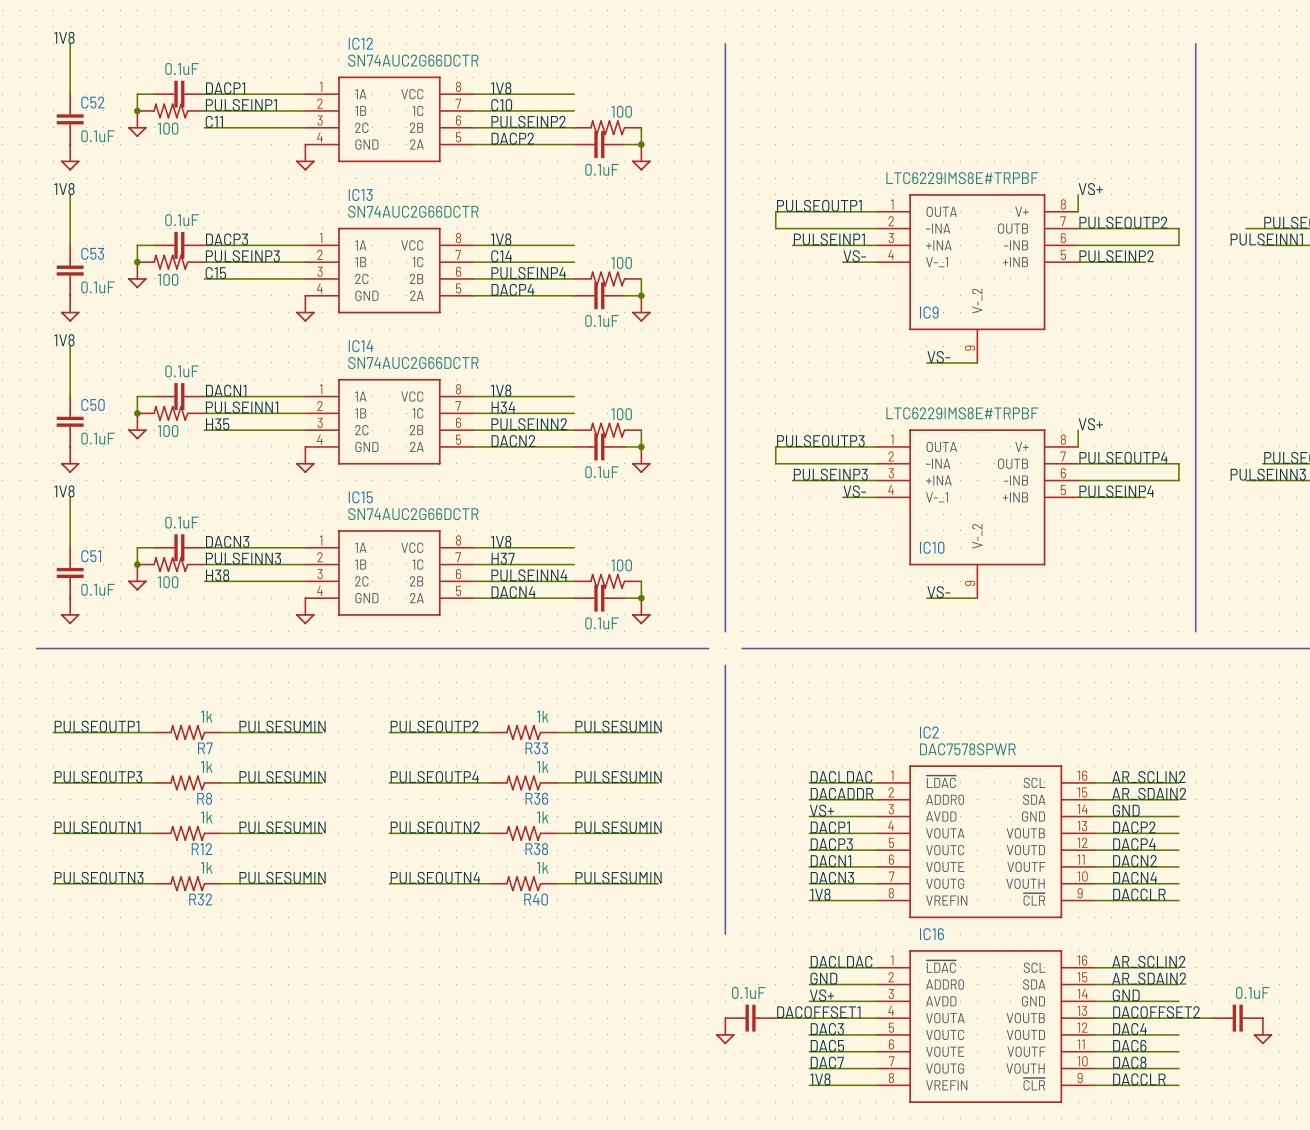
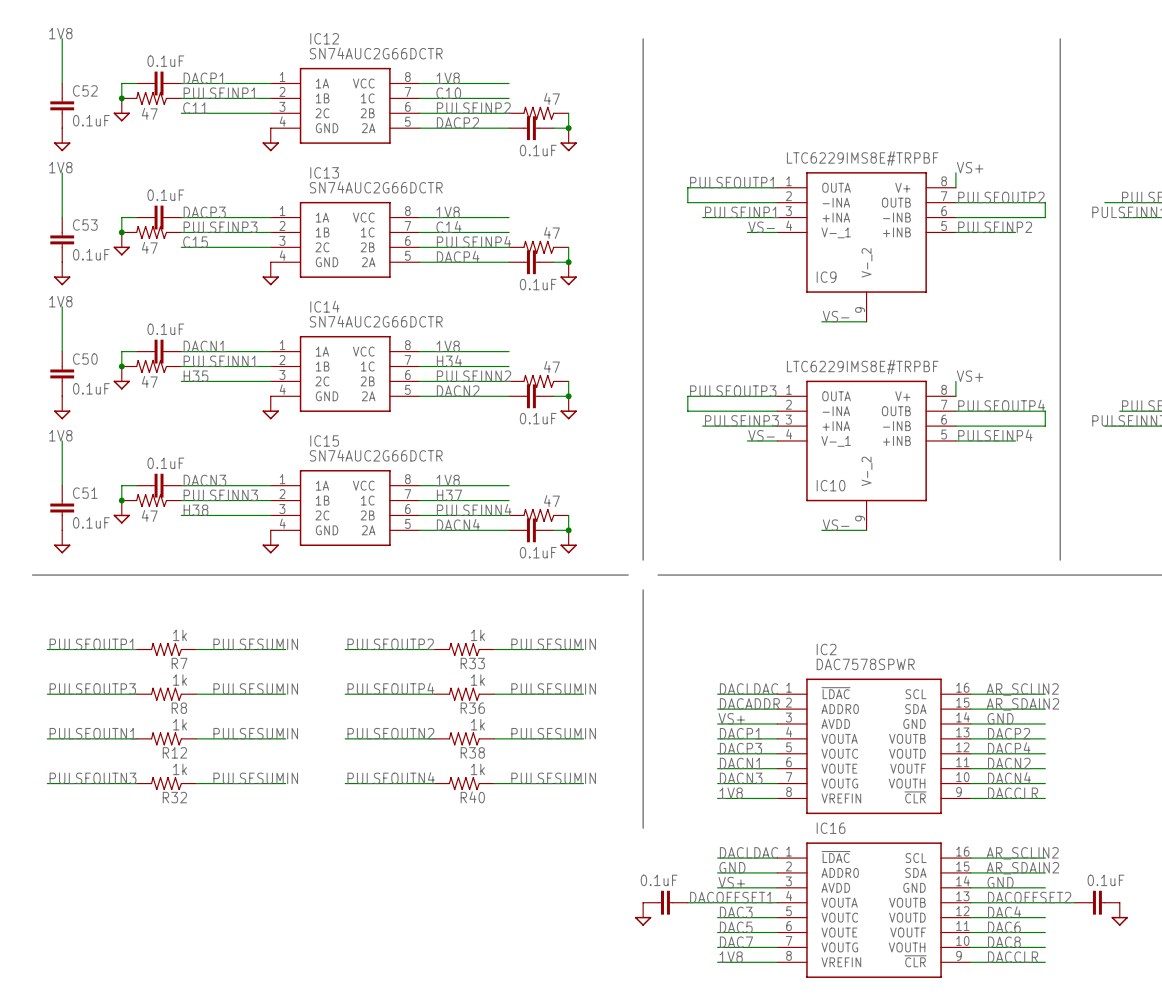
part value: 100 (621, 111) -> 47 (551, 98)
part value: 100 (168, 128) -> 47 (149, 113)
part value: 100 (621, 263) -> 47 (551, 232)
part value: 100 (168, 279) -> 47 (149, 247)
part value: 100 (621, 414) -> 47 (551, 367)
part value: 100 (168, 431) -> 47 (149, 381)
part value: 100 (621, 565) -> 47 (551, 501)
part value: 100 (168, 582) -> 47 (149, 515)

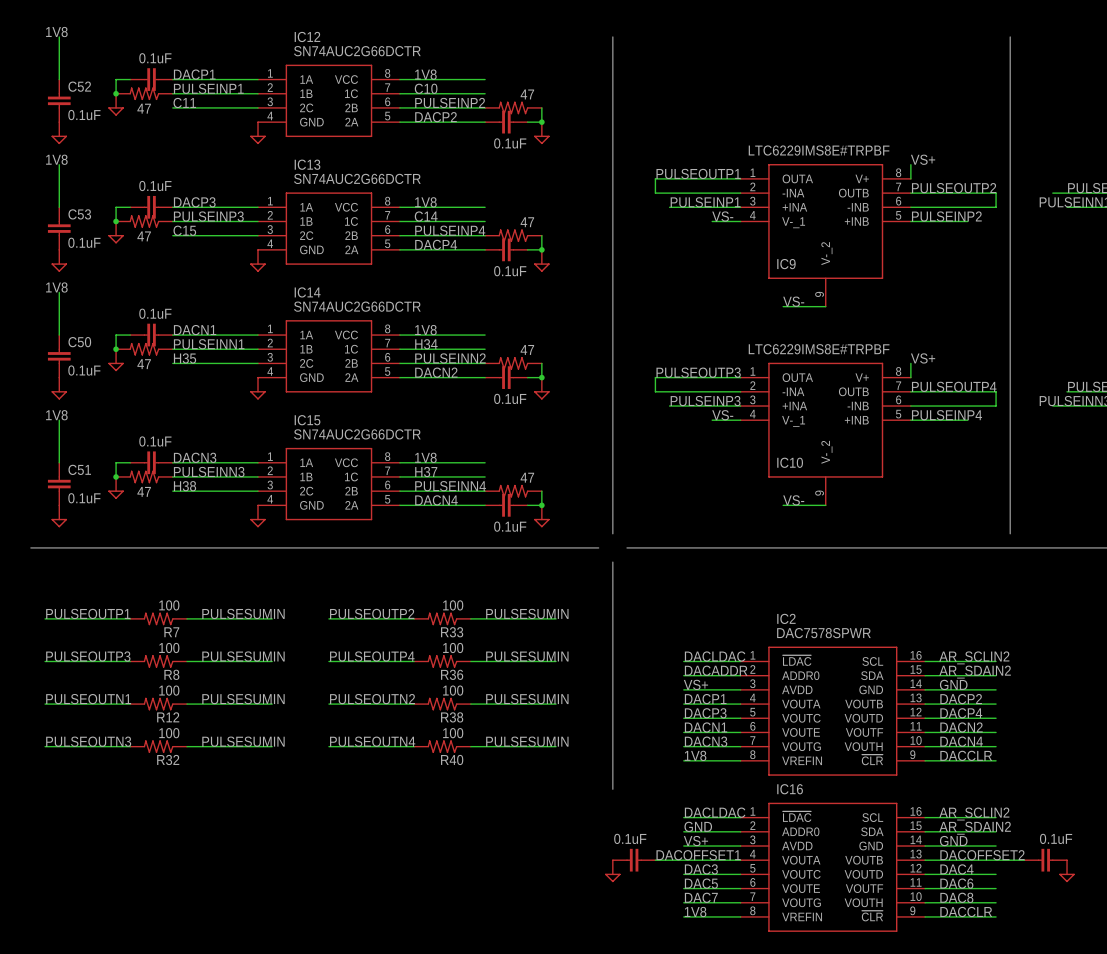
R7 value: 1k (180, 635) -> 100 (169, 605)
R33 value: 1k (477, 635) -> 100 (453, 605)
R8 value: 1k (180, 680) -> 100 (169, 648)
R36 value: 1k (477, 680) -> 100 (453, 648)
R12 value: 1k (180, 724) -> 100 (169, 690)
R38 value: 1k (477, 724) -> 100 (453, 690)
R32 value: 1k (180, 769) -> 100 (169, 733)
R40 value: 1k (477, 769) -> 100 (453, 733)

